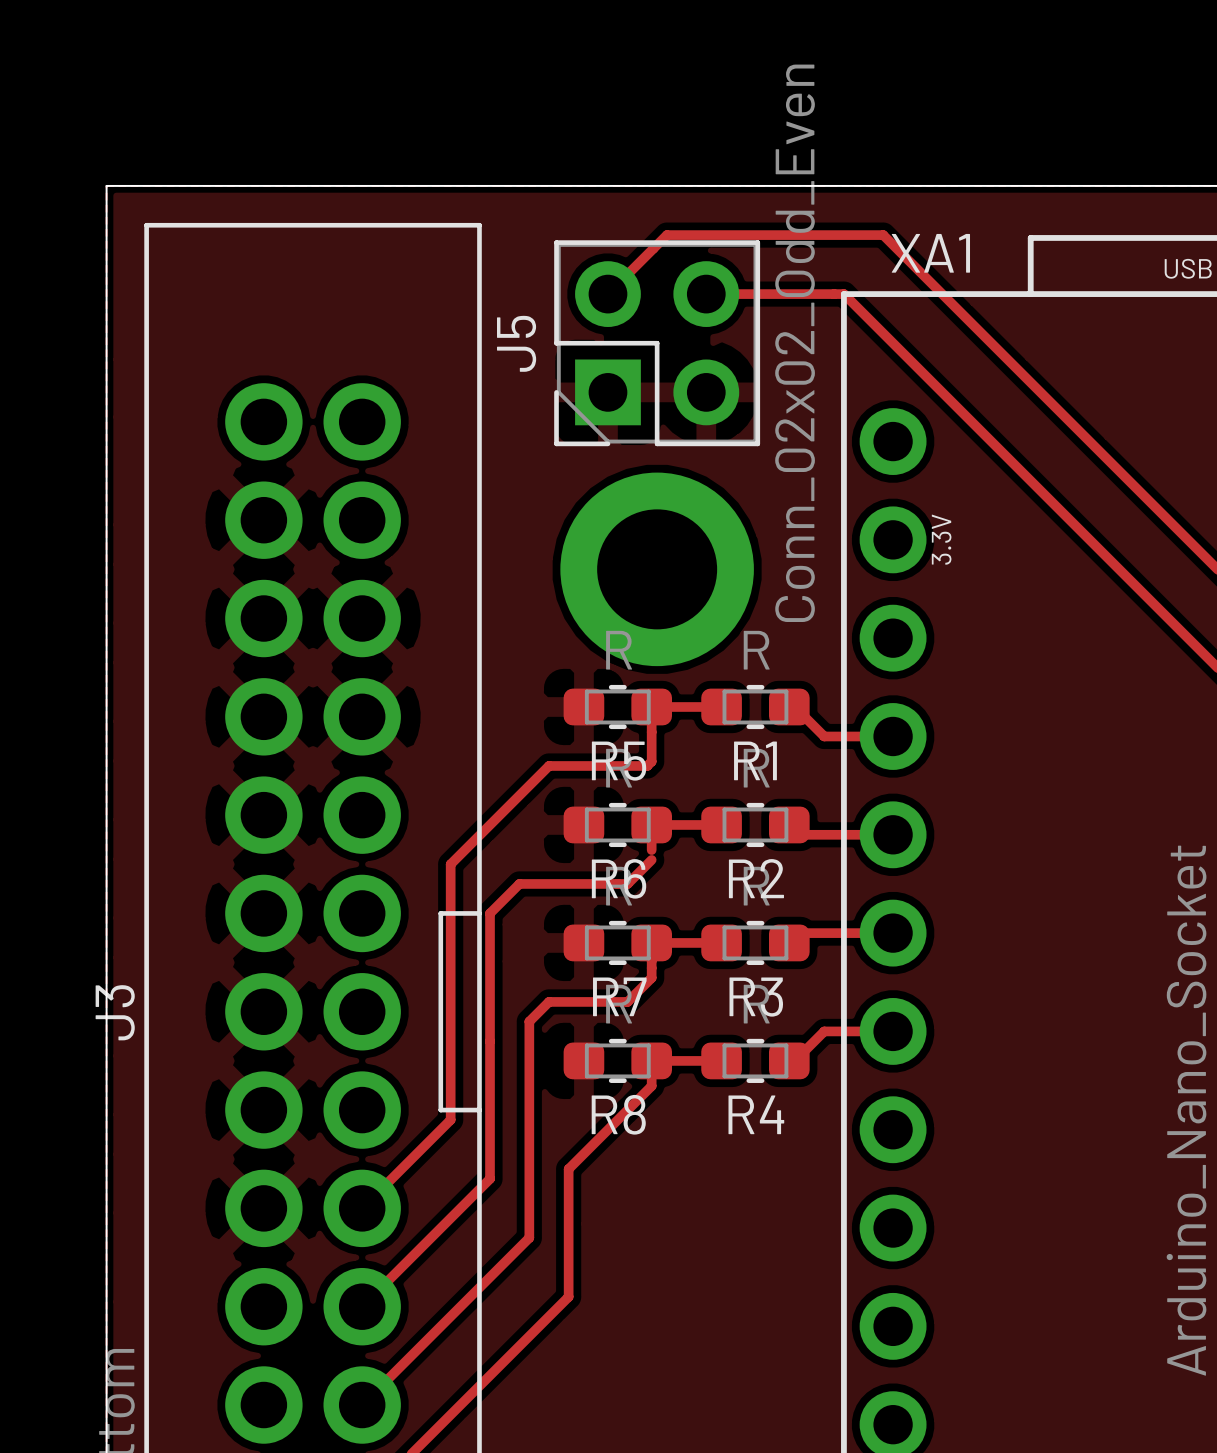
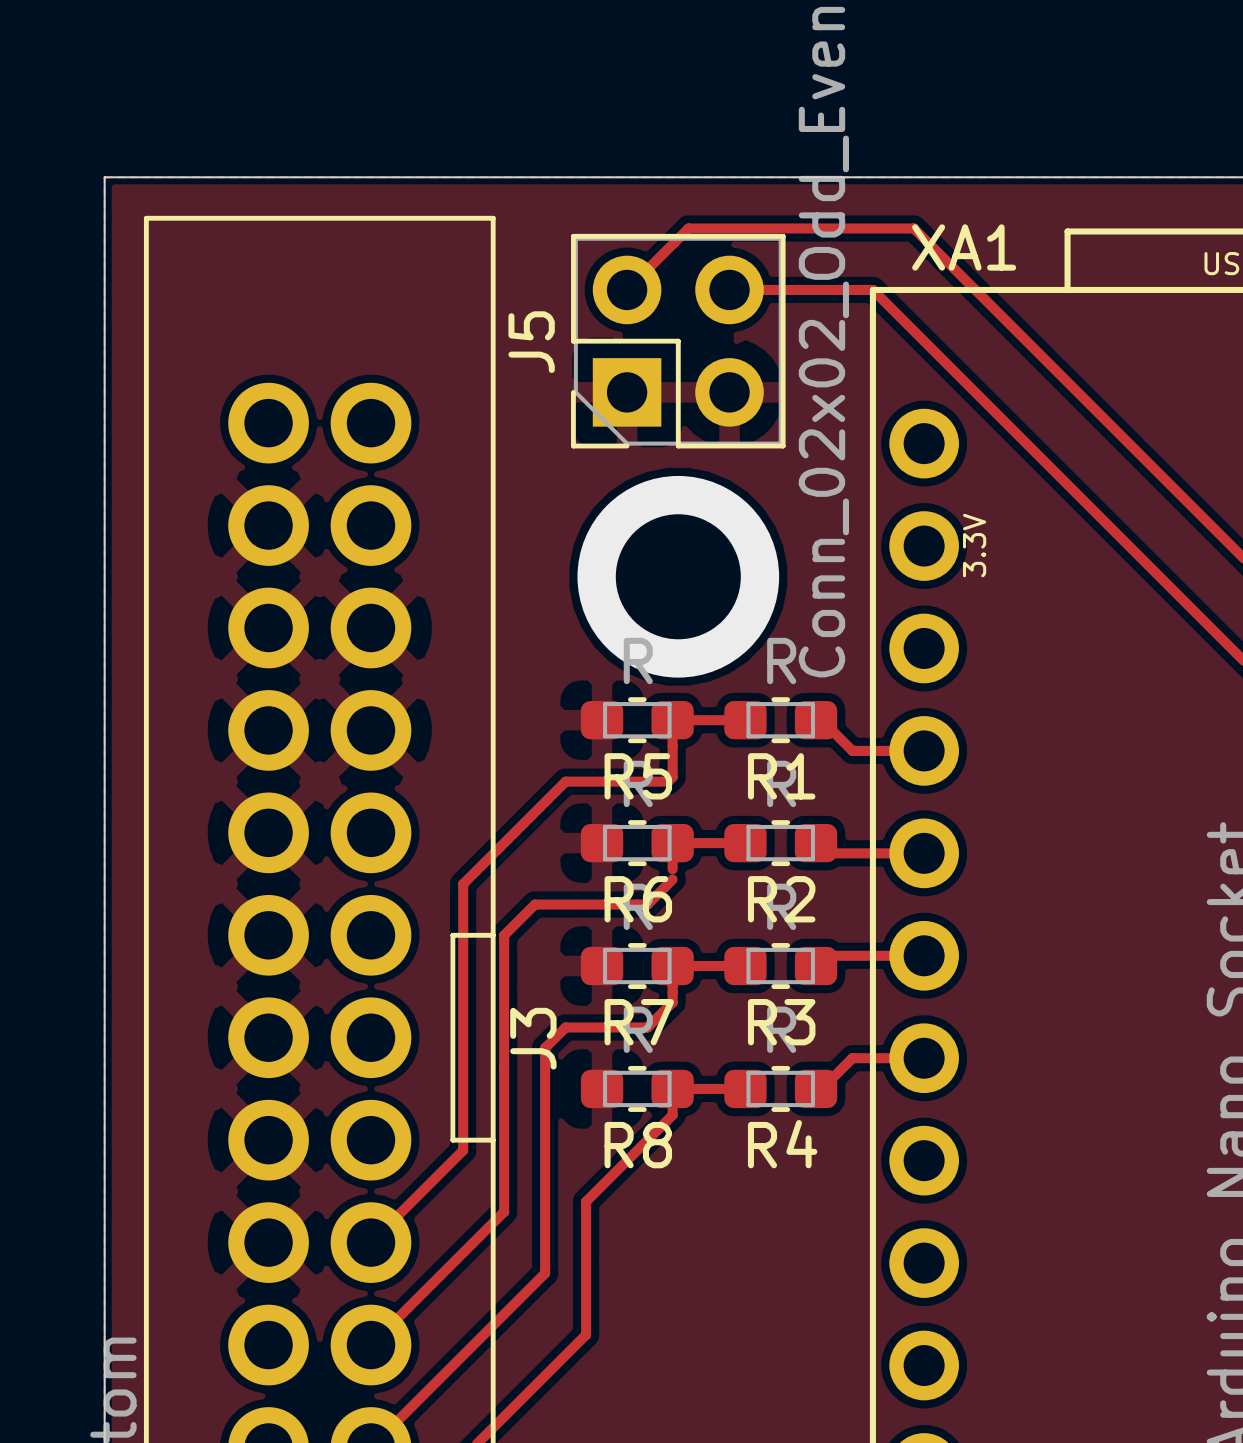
J3 name position: J3 (115, 1012) -> J3 (533, 1038)

